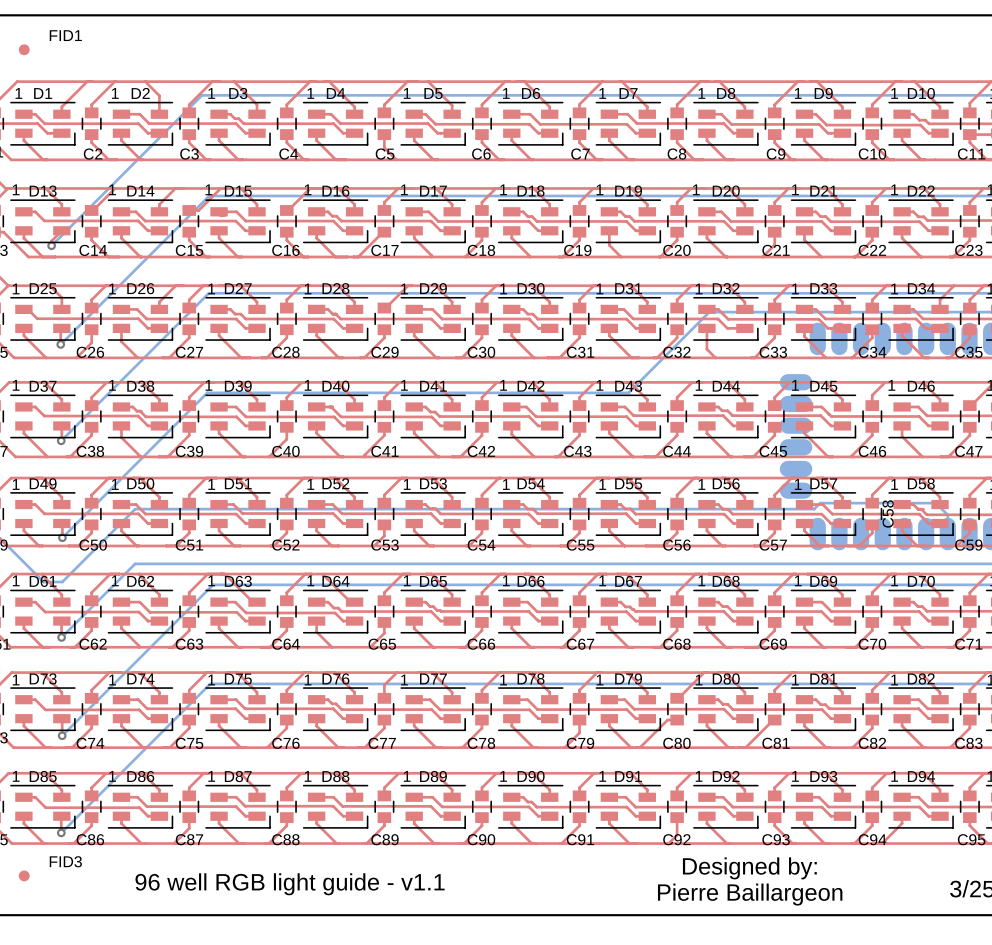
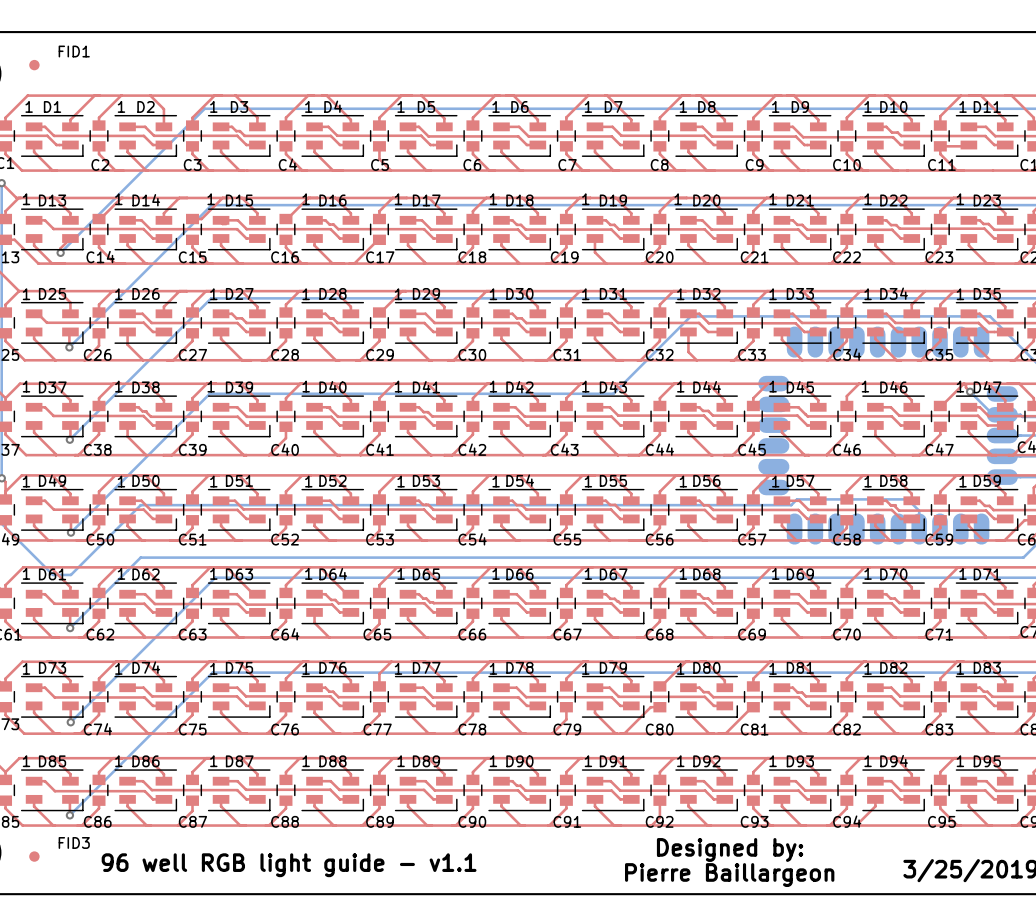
C58 name rotation: 0° (888, 513) -> 90° clockwise (846, 539)

